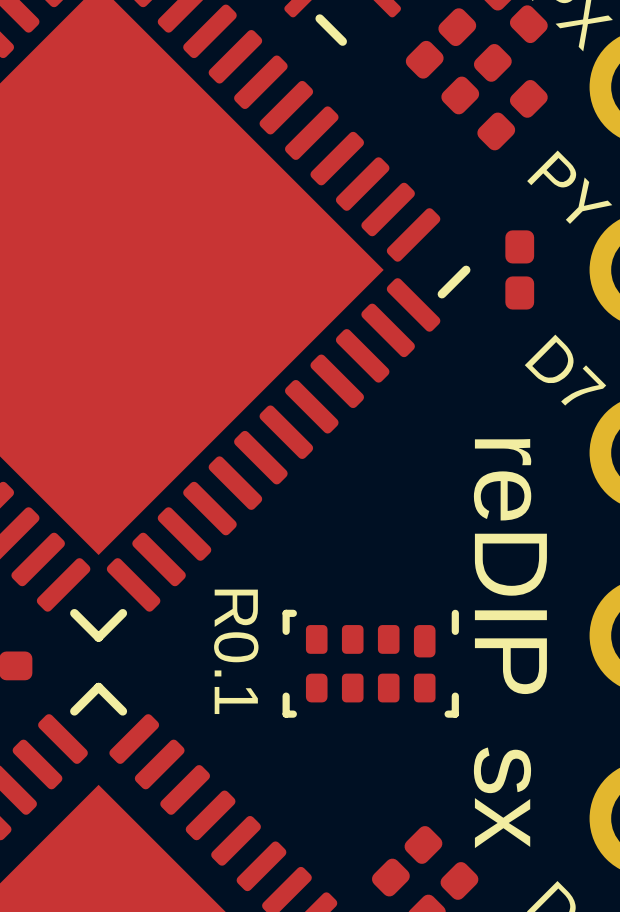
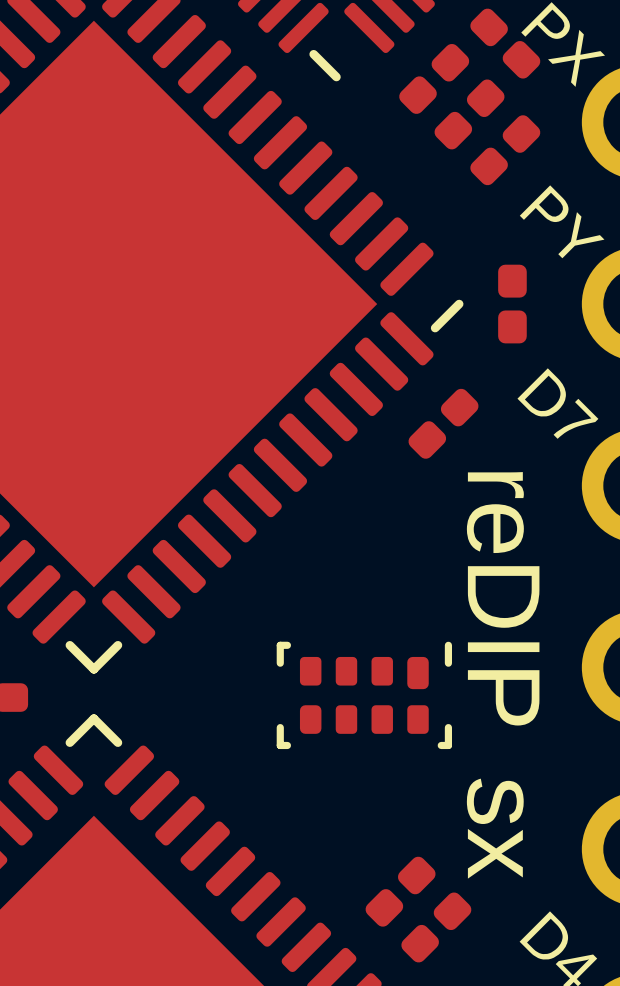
part: none -> (443, 423)
text: R0.1 (236, 651) -> none

